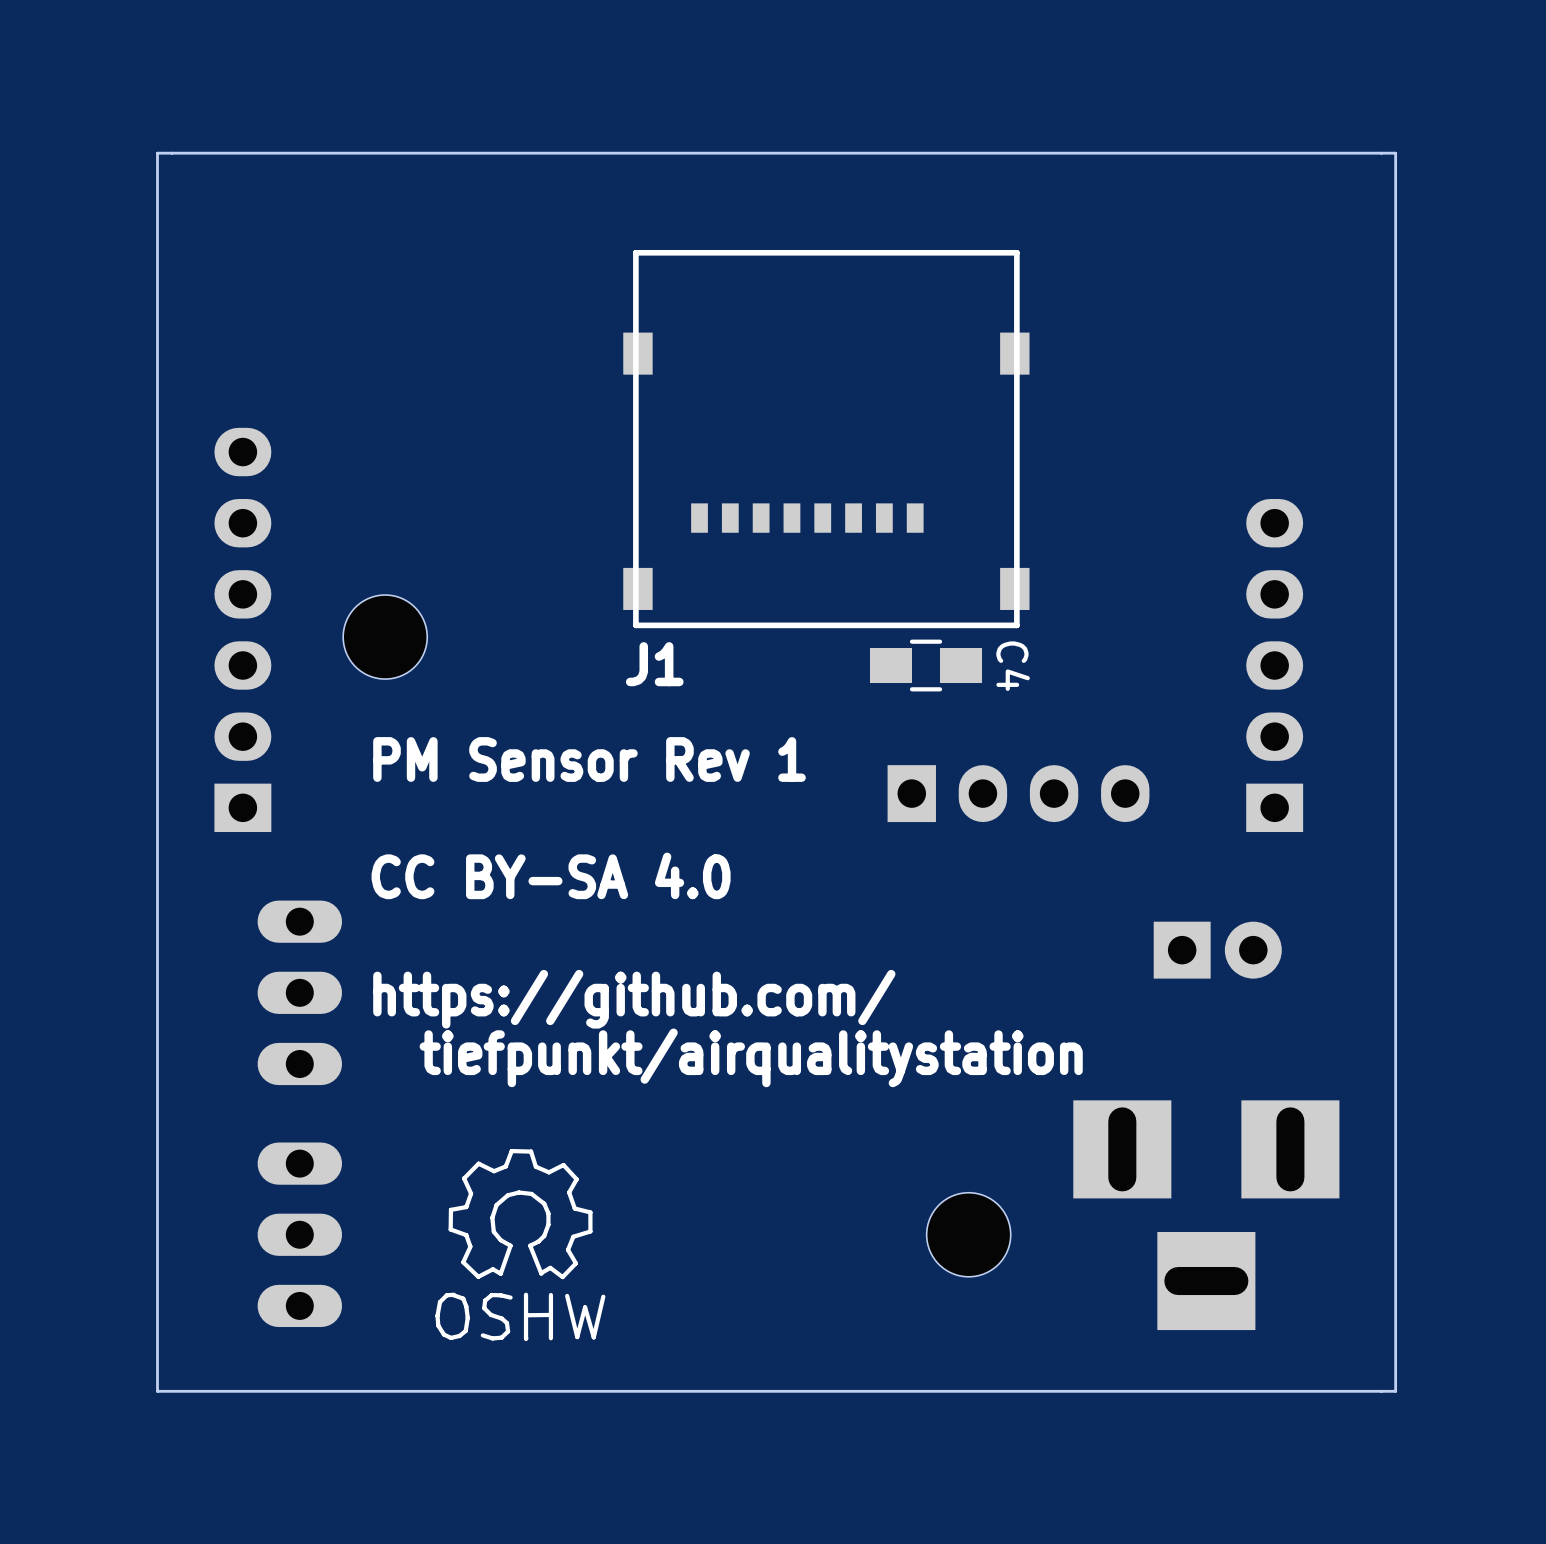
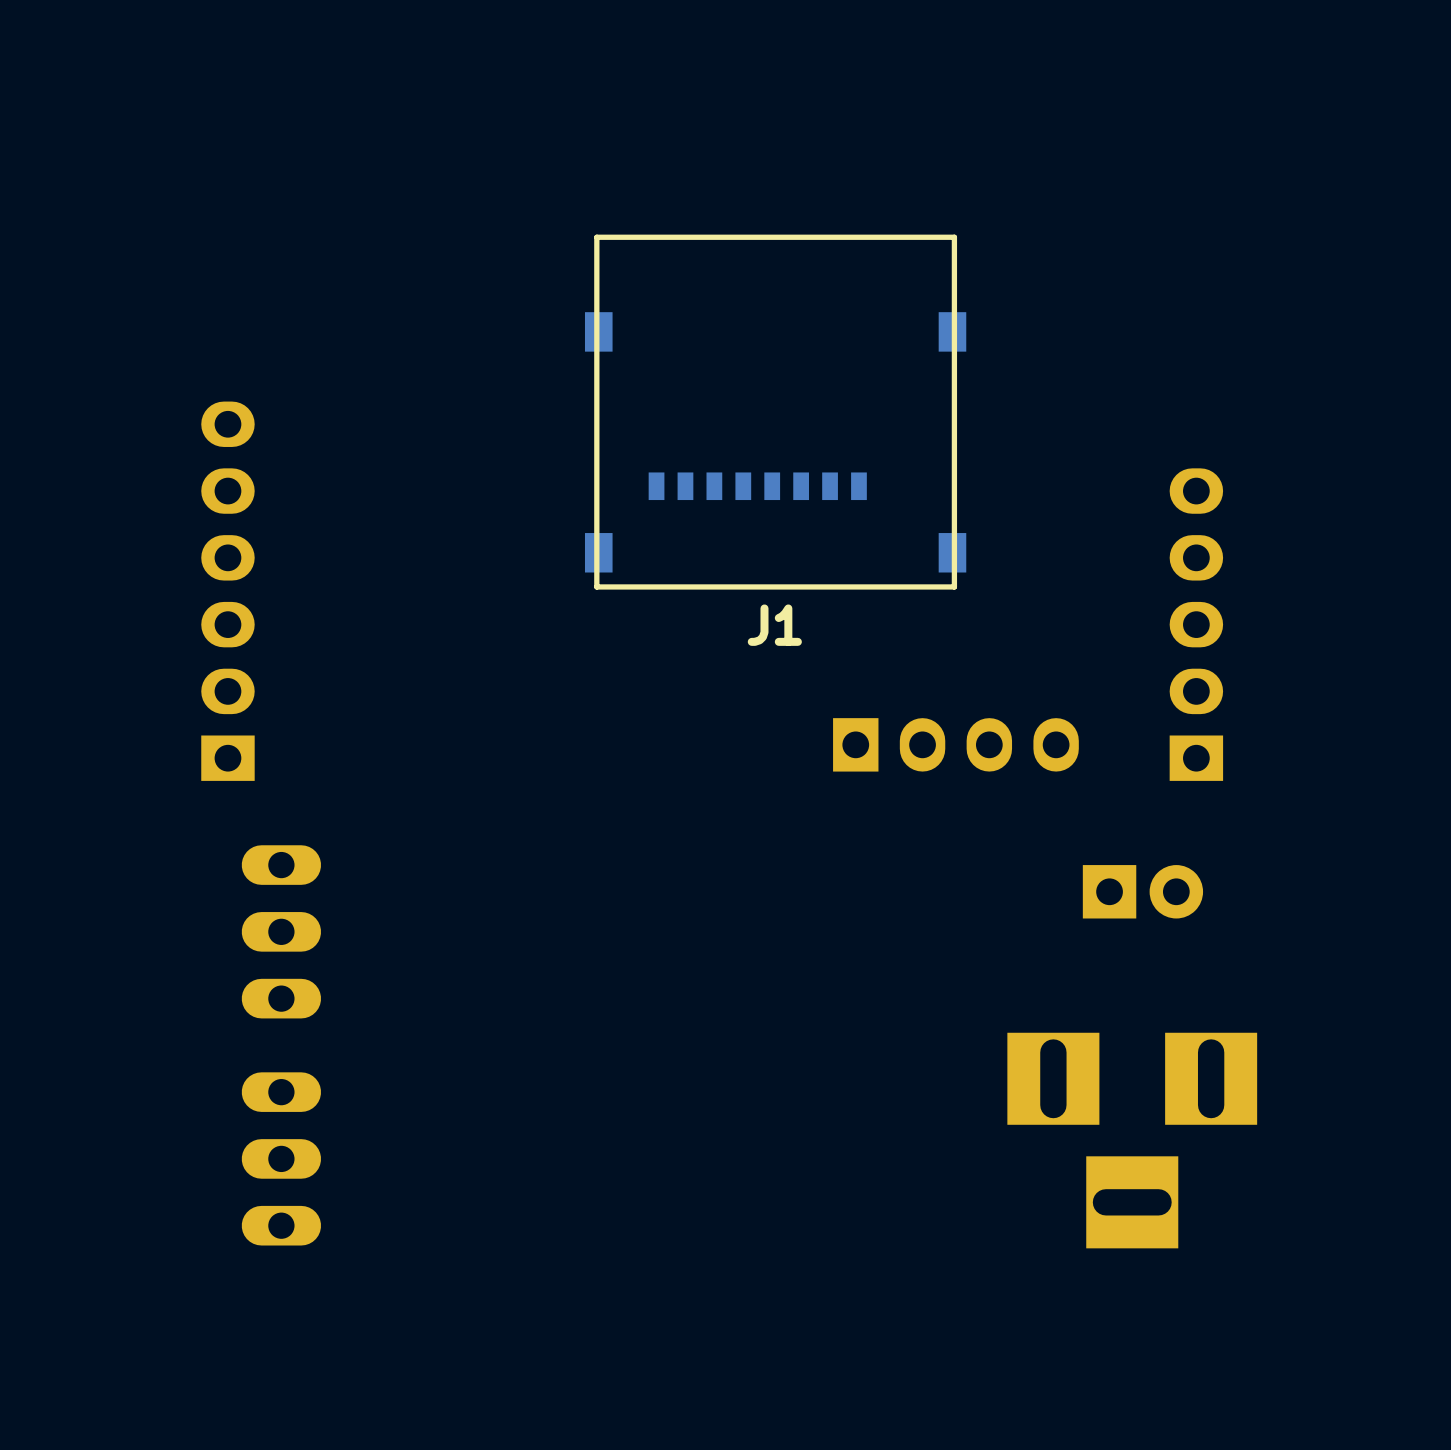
board edge: (1395, 153) (1395, 1391) (157, 1391) (157, 153) (1395, 153) -> none
part: (385, 637) -> none
J1 name position: J1 (654, 664) -> J1 (774, 625)
C4: (926, 665) -> none
text: PM Sensor Rev 1 (589, 759) -> none
text: CC BY-SA 4.0 (551, 875) -> none
text: https://github.com/ (634, 999) -> none
text: tiefpunkt/airqualitystation (751, 1057) -> none
drawing: [435, 1148, 606, 1341] -> none
part: (968, 1234) -> none

